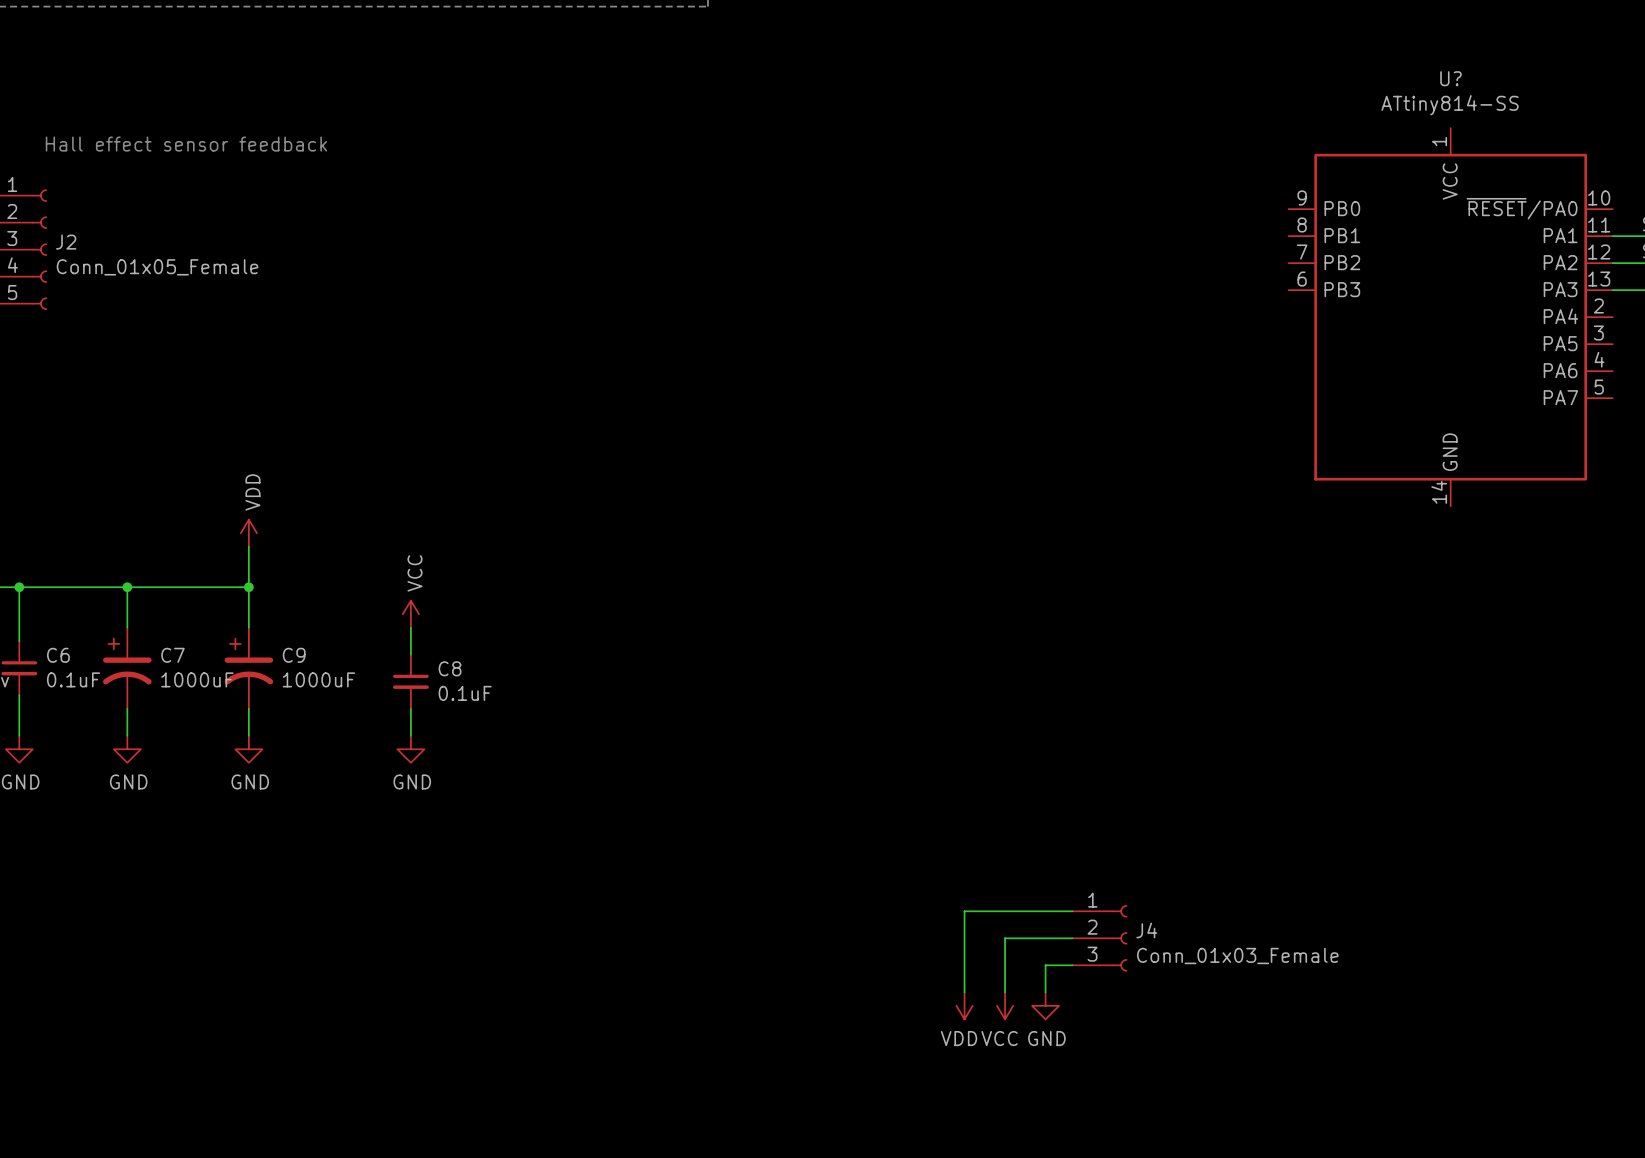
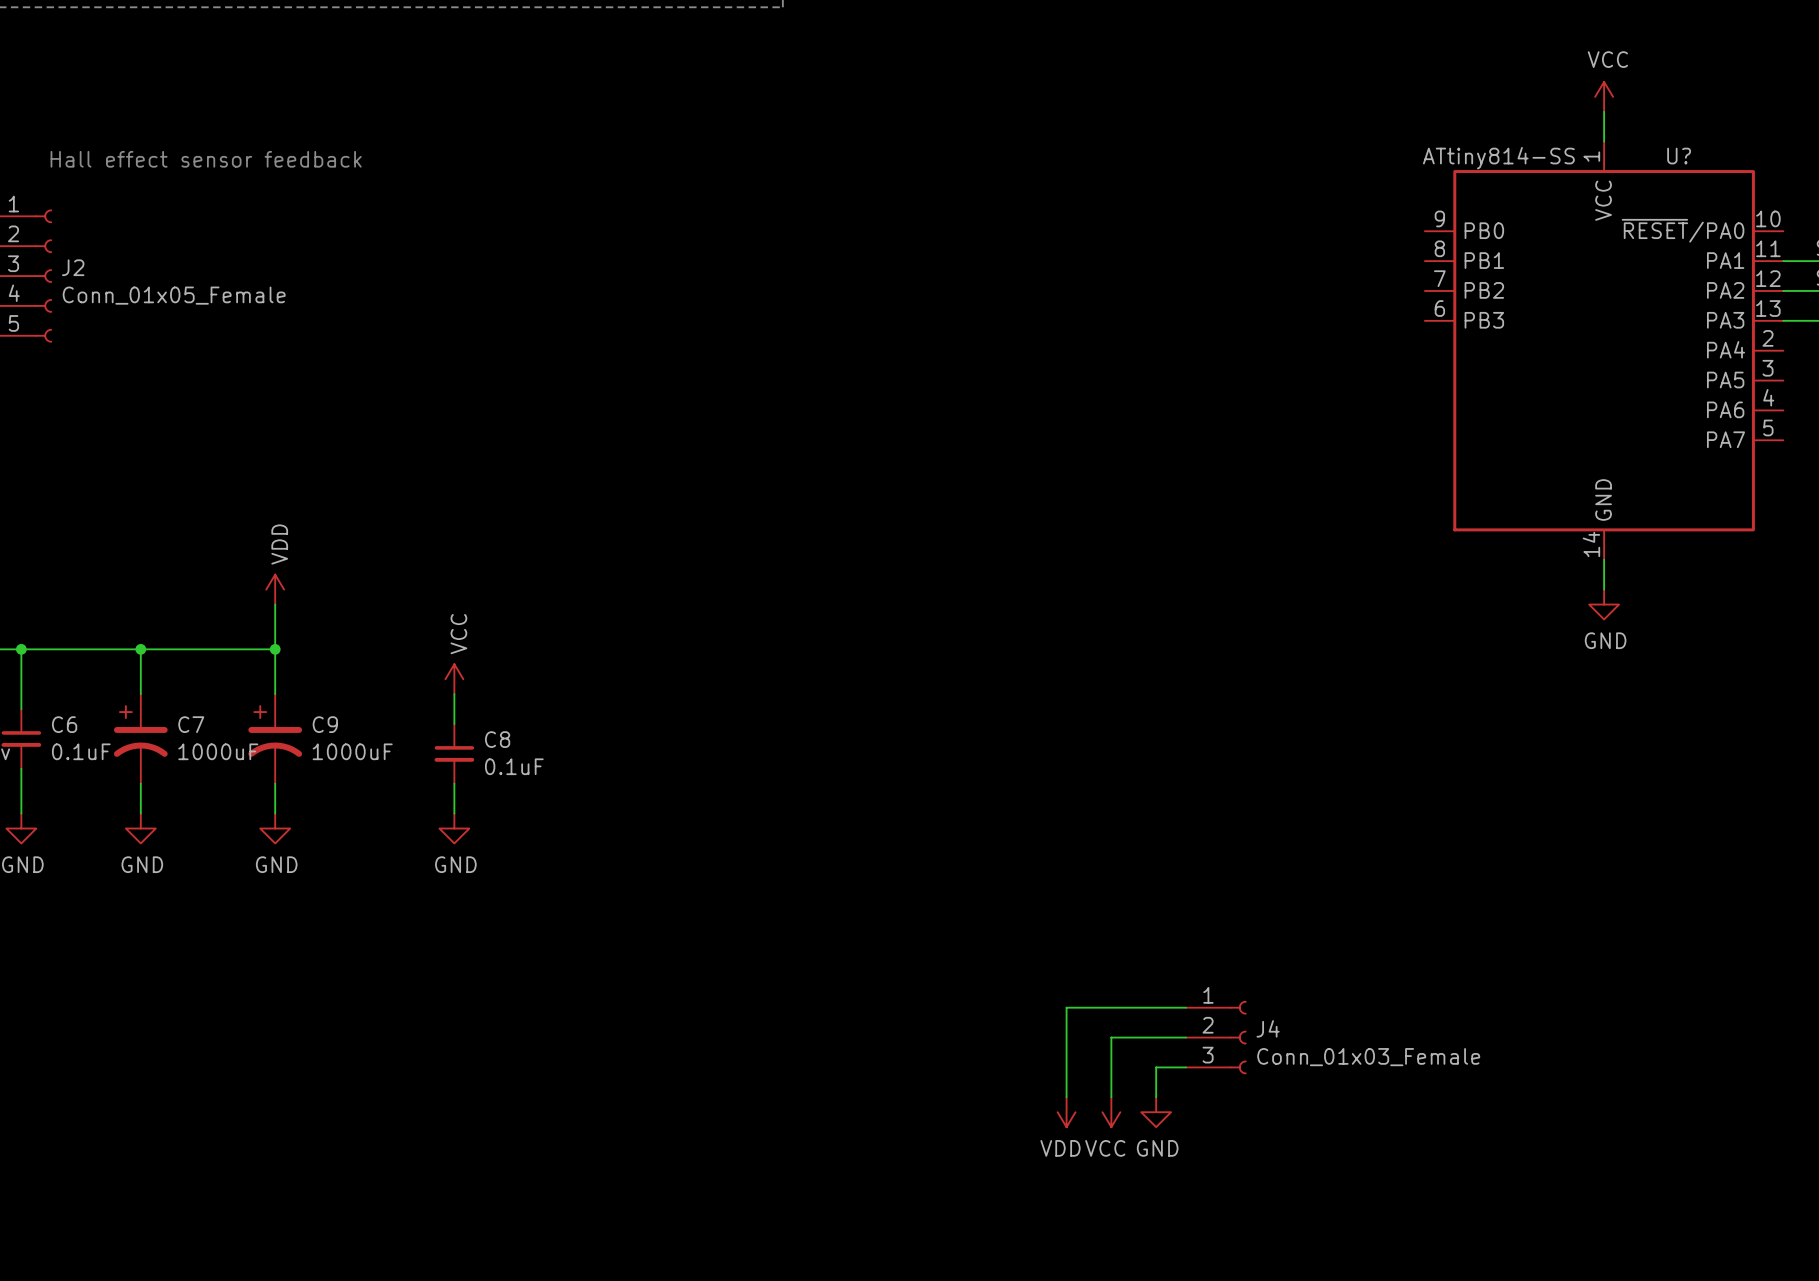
U? name position: U? (1450, 78) -> U? (1679, 156)
power symbol: none -> VCC (1604, 96)
wire: none -> (1604, 111) (1604, 141)
U? value position: ATtiny814-SS (1450, 105) -> ATtiny814-SS (1498, 158)
wire: none -> (1604, 559) (1604, 589)
power symbol: none -> GND (1604, 604)

